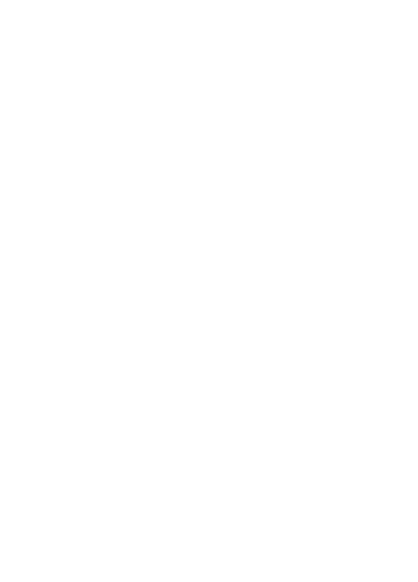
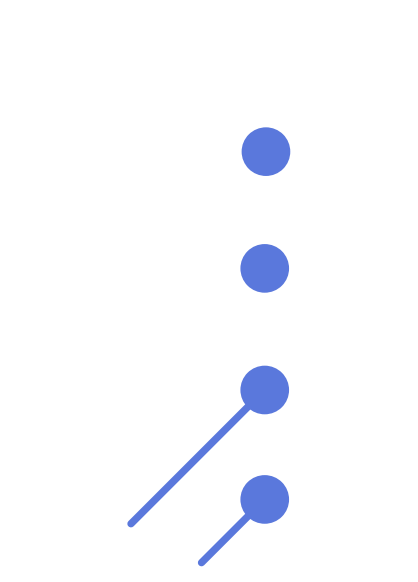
part: none -> (265, 151)
part: none -> (264, 268)
bottom track: none -> (264, 389) (130, 523)
part: none -> (264, 389)
bottom track: none -> (264, 499) (201, 562)
part: none -> (264, 499)

